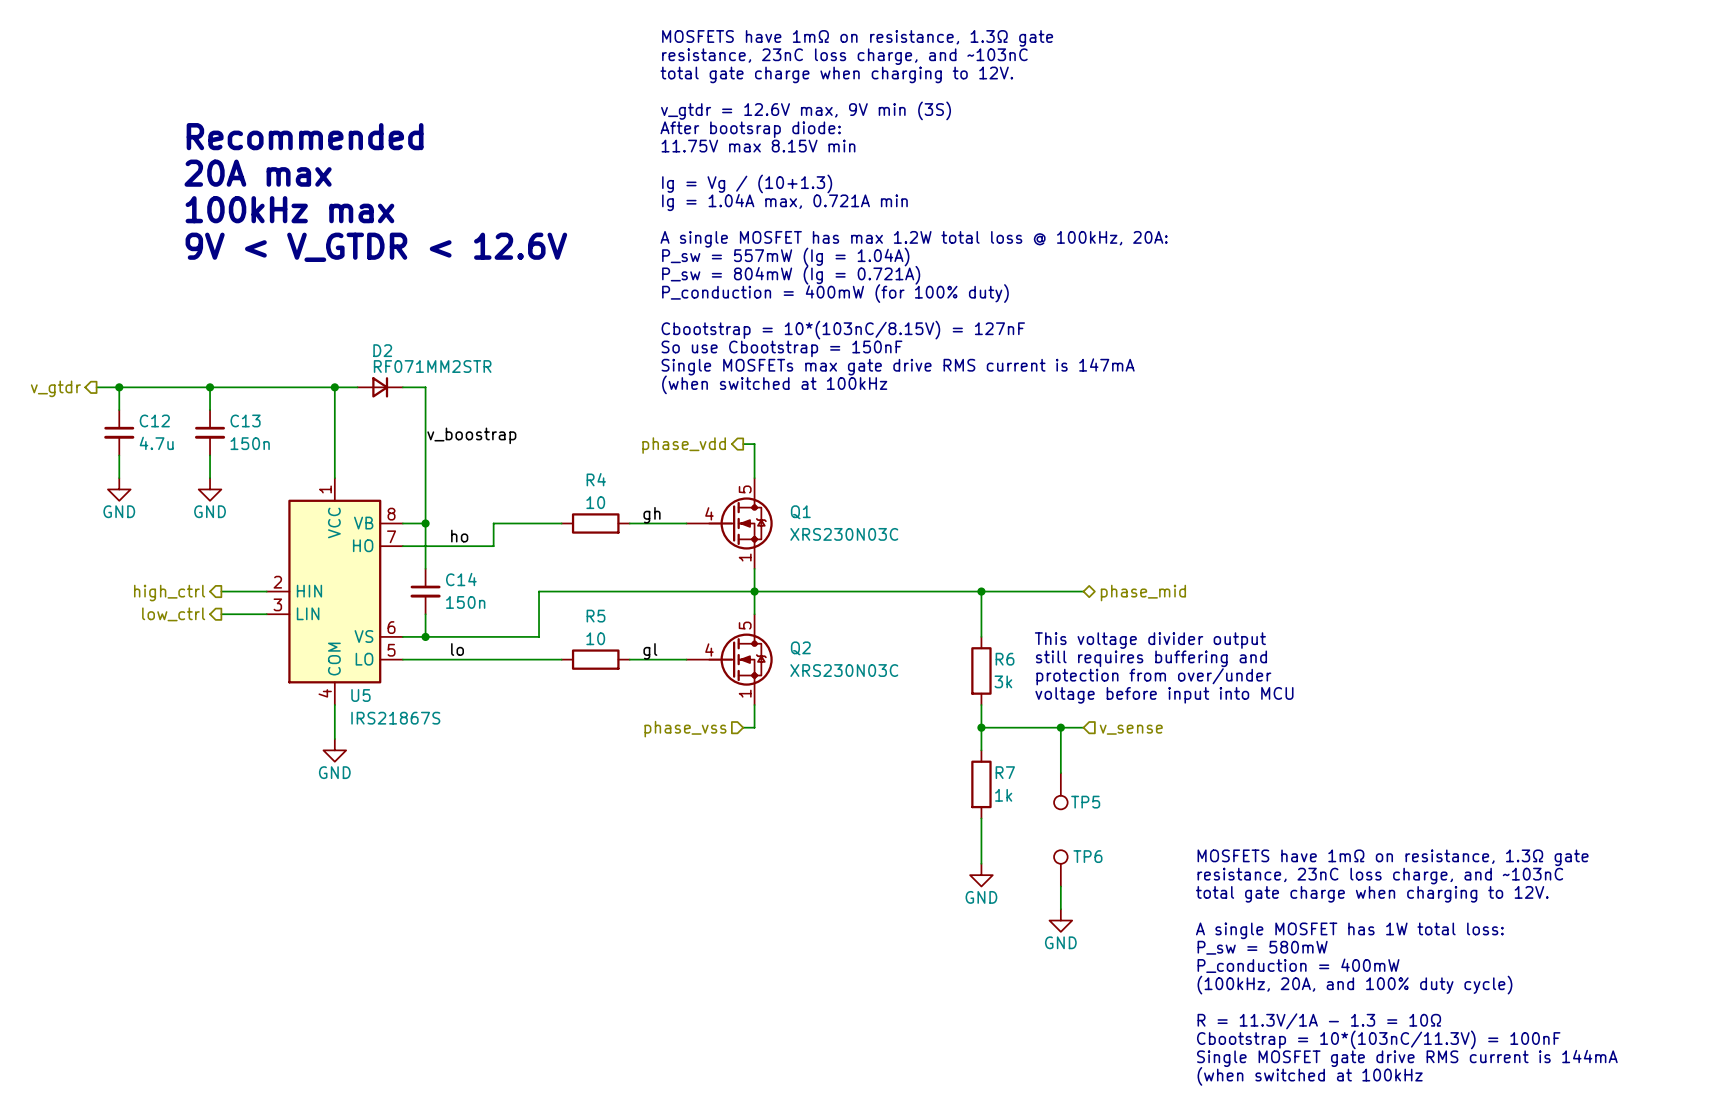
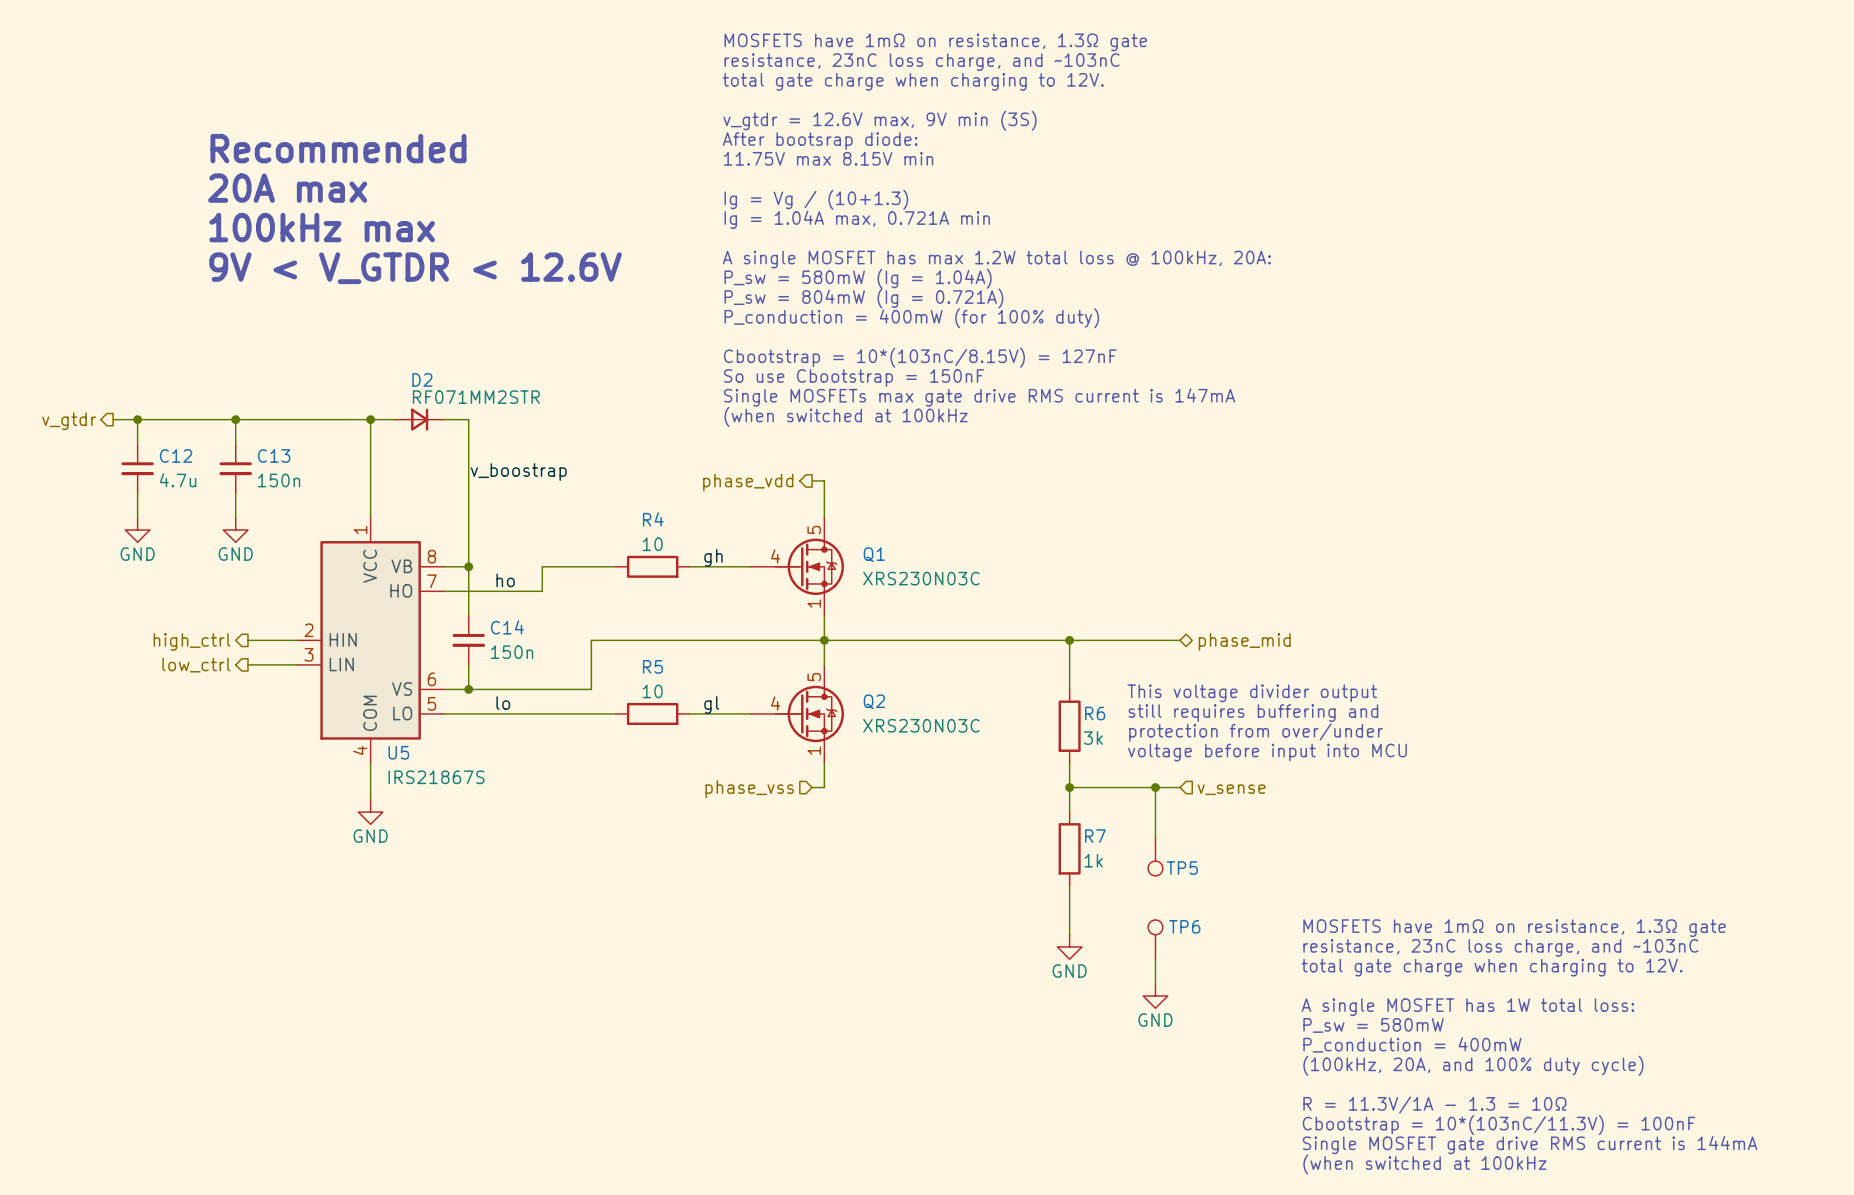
text: P_sw = 557mW (Ig = 1.04A) (785, 257) -> P_sw = 580mW (Ig = 1.04A) (858, 278)

